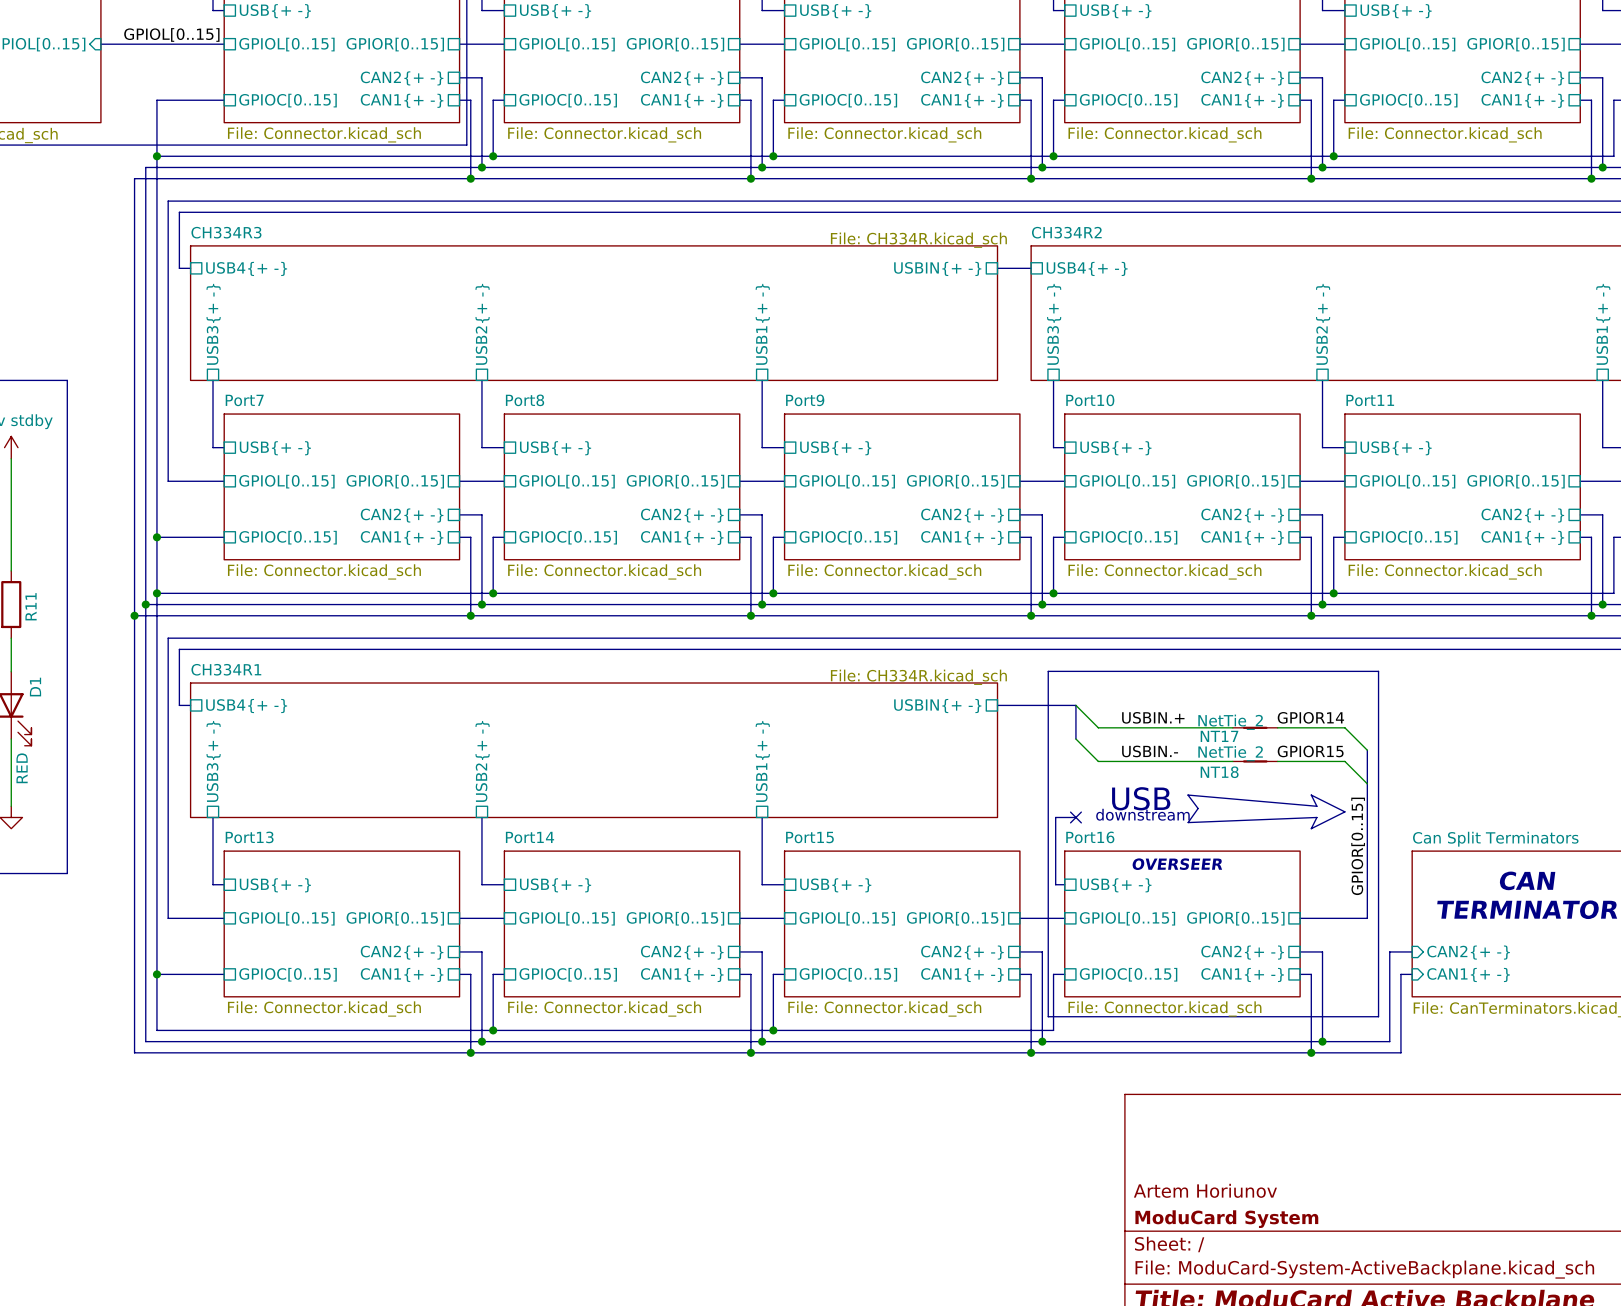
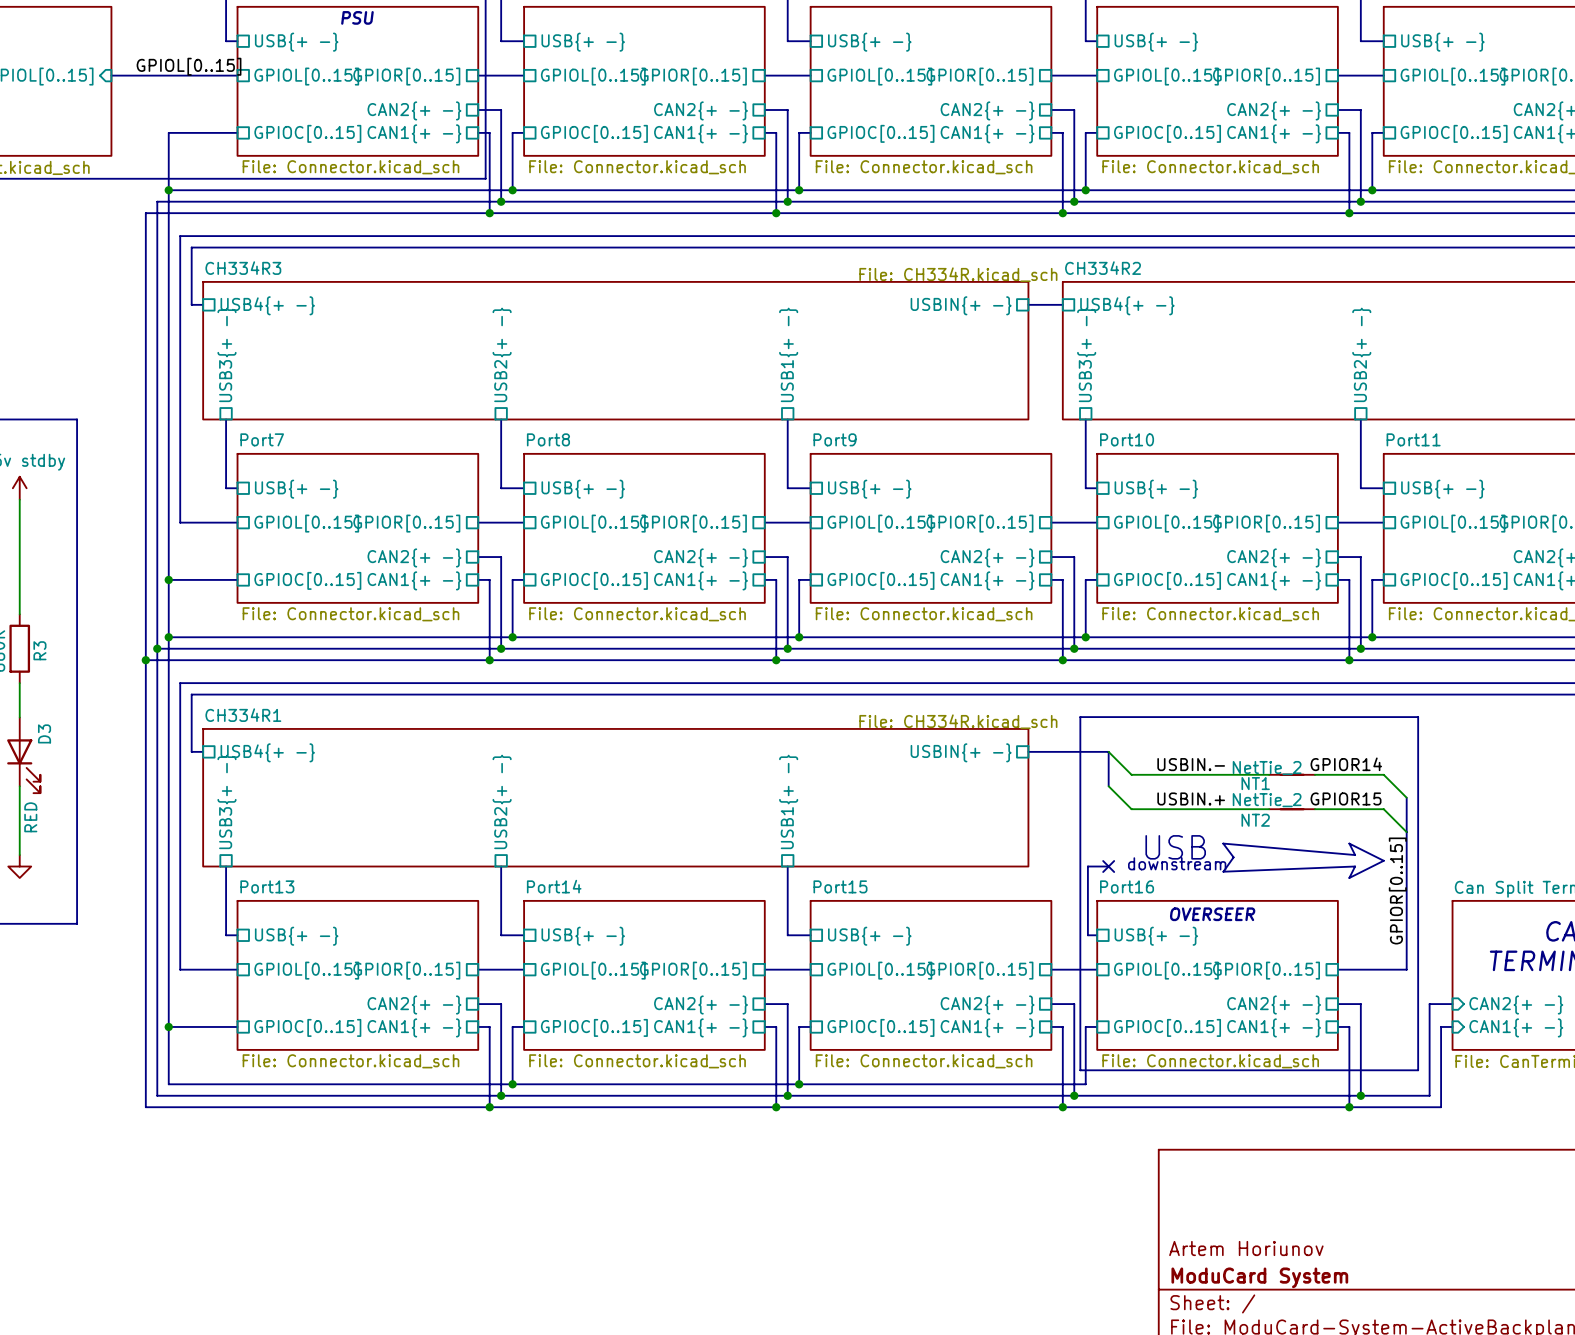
R11 name: R11 (31, 606) -> R3 (39, 650)
D1 name: D1 (35, 687) -> D3 (44, 733)
label: USBIN.+ (1153, 717) -> USBIN.- (1191, 764)
NT17 name: NT17 (1219, 736) -> NT1 (1255, 783)
label: USBIN.- (1150, 751) -> USBIN.+ (1191, 798)
NT18 name: NT18 (1219, 772) -> NT2 (1255, 820)

